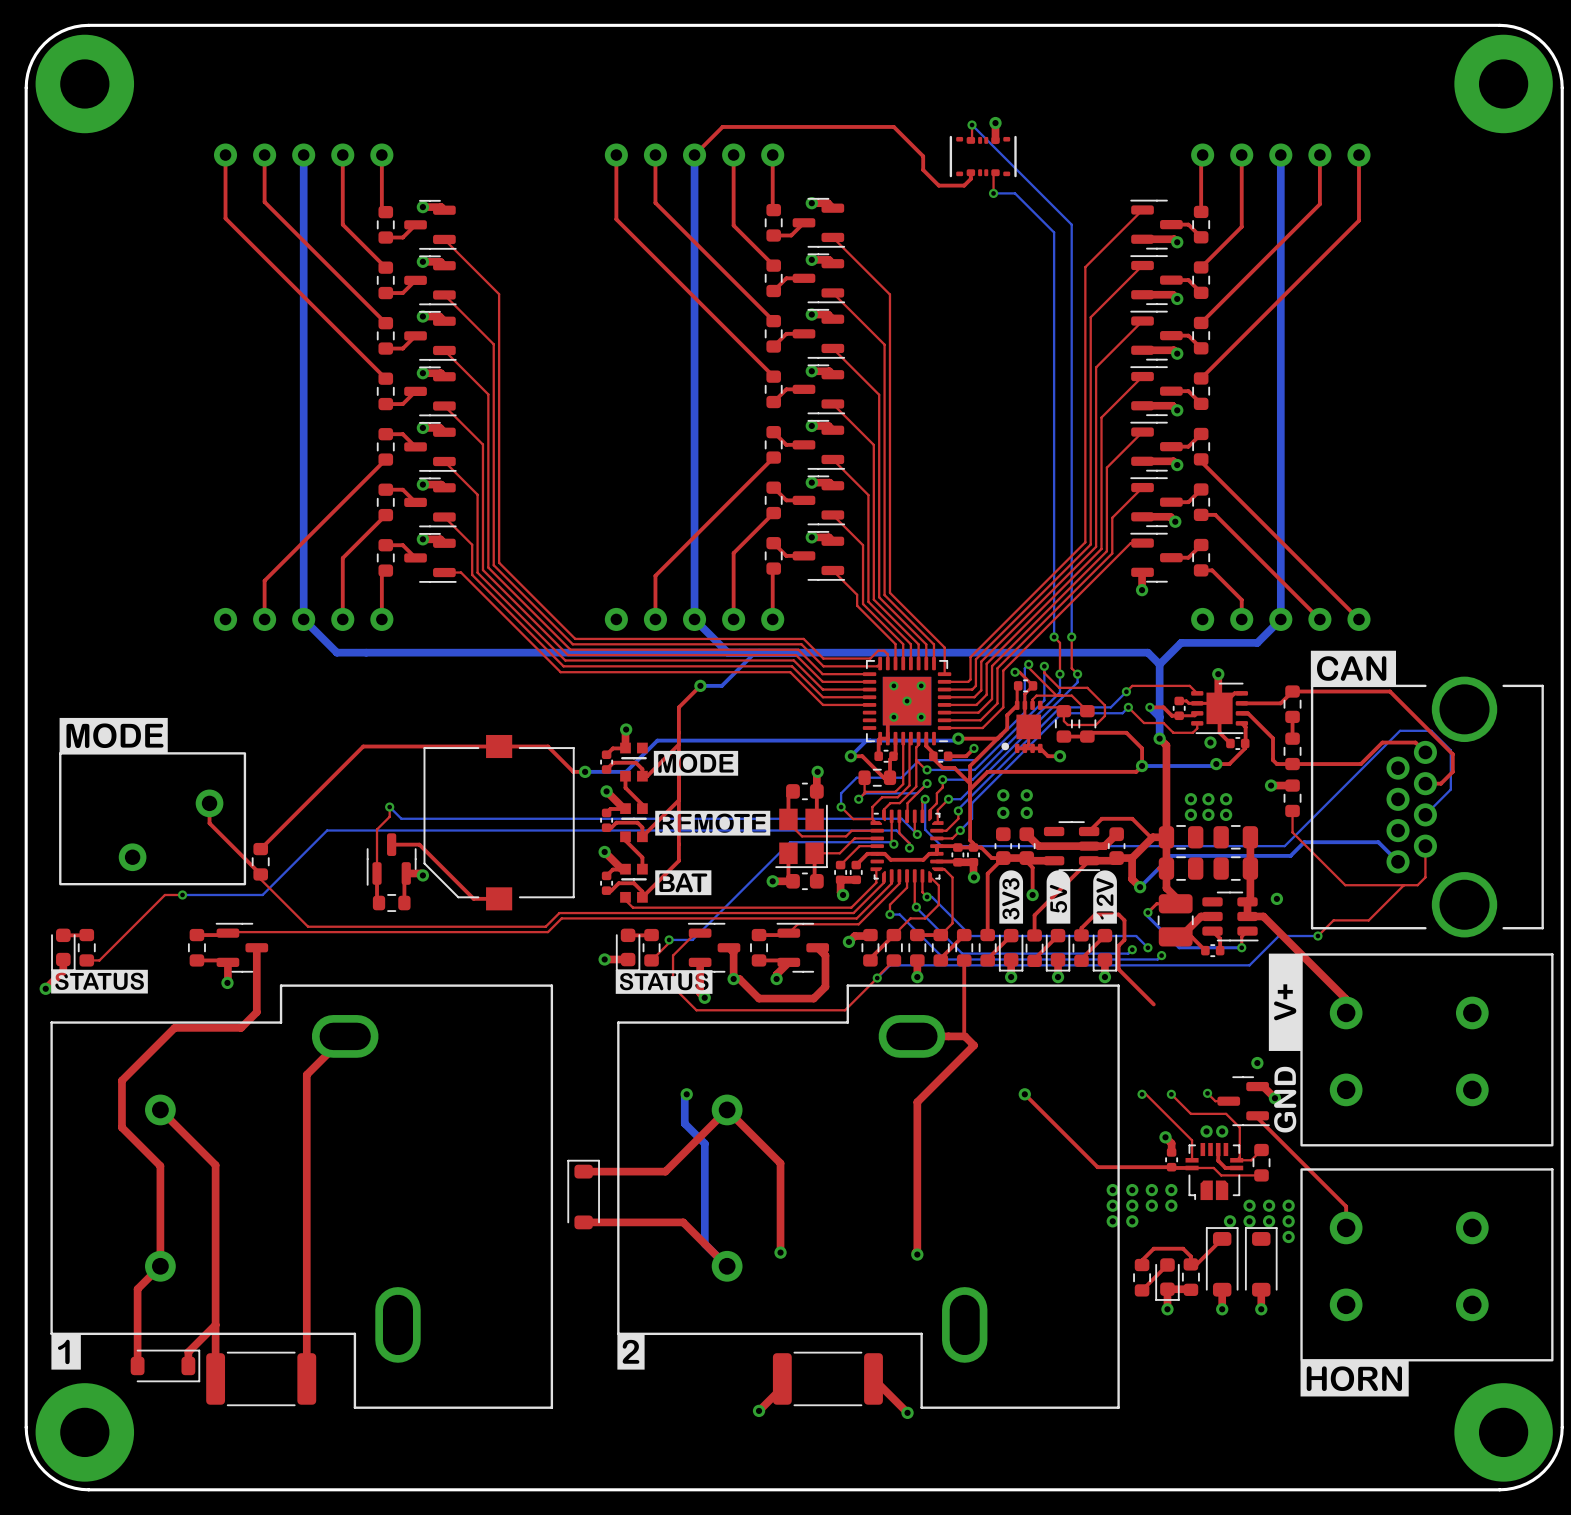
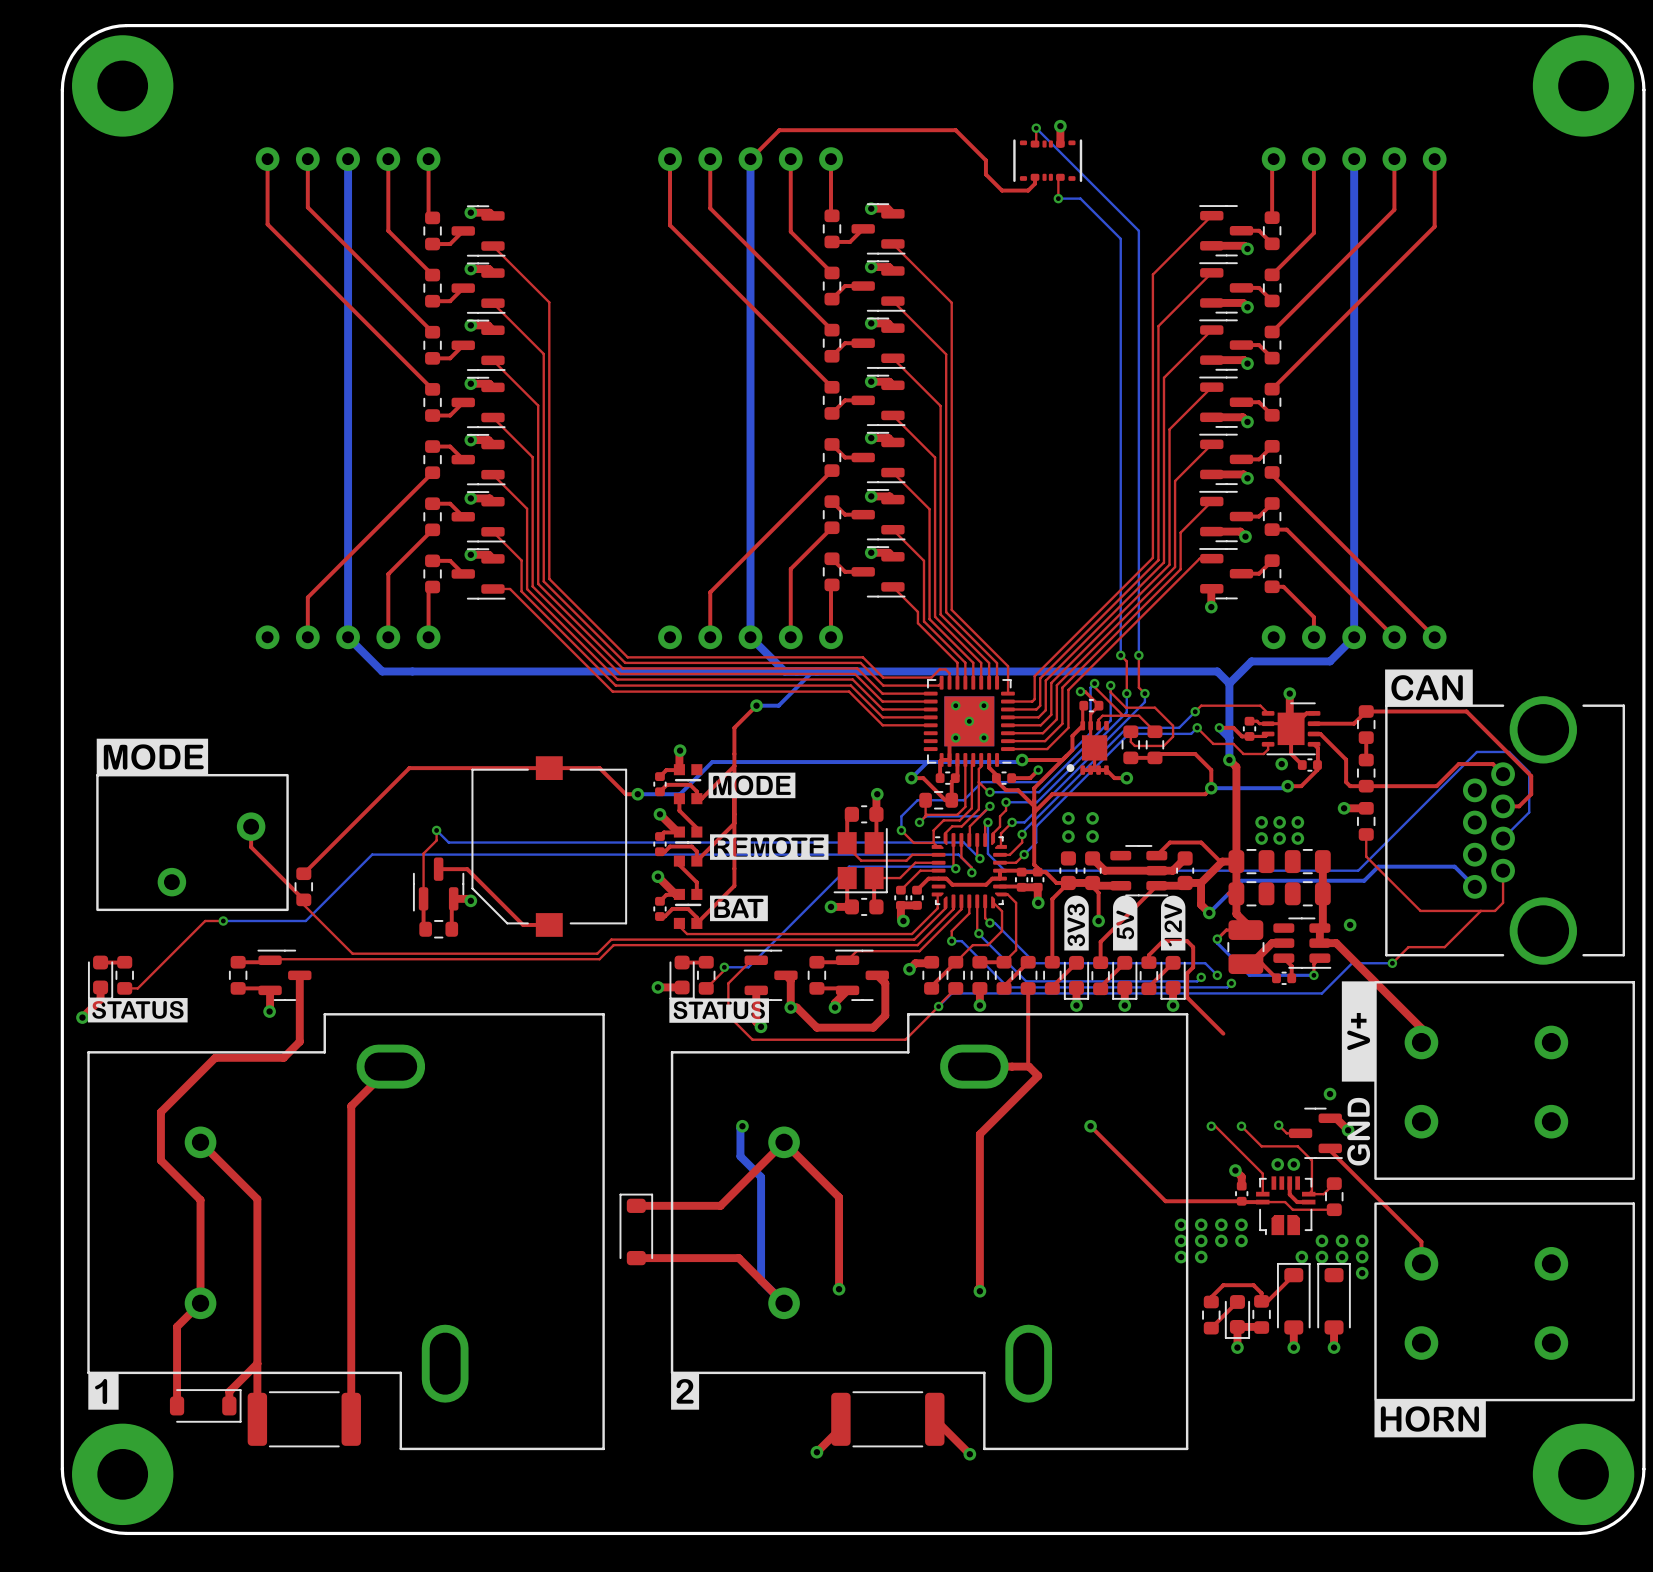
top track: (1040, 705) (1042, 707) (1060, 707) (1063, 711) -> none

